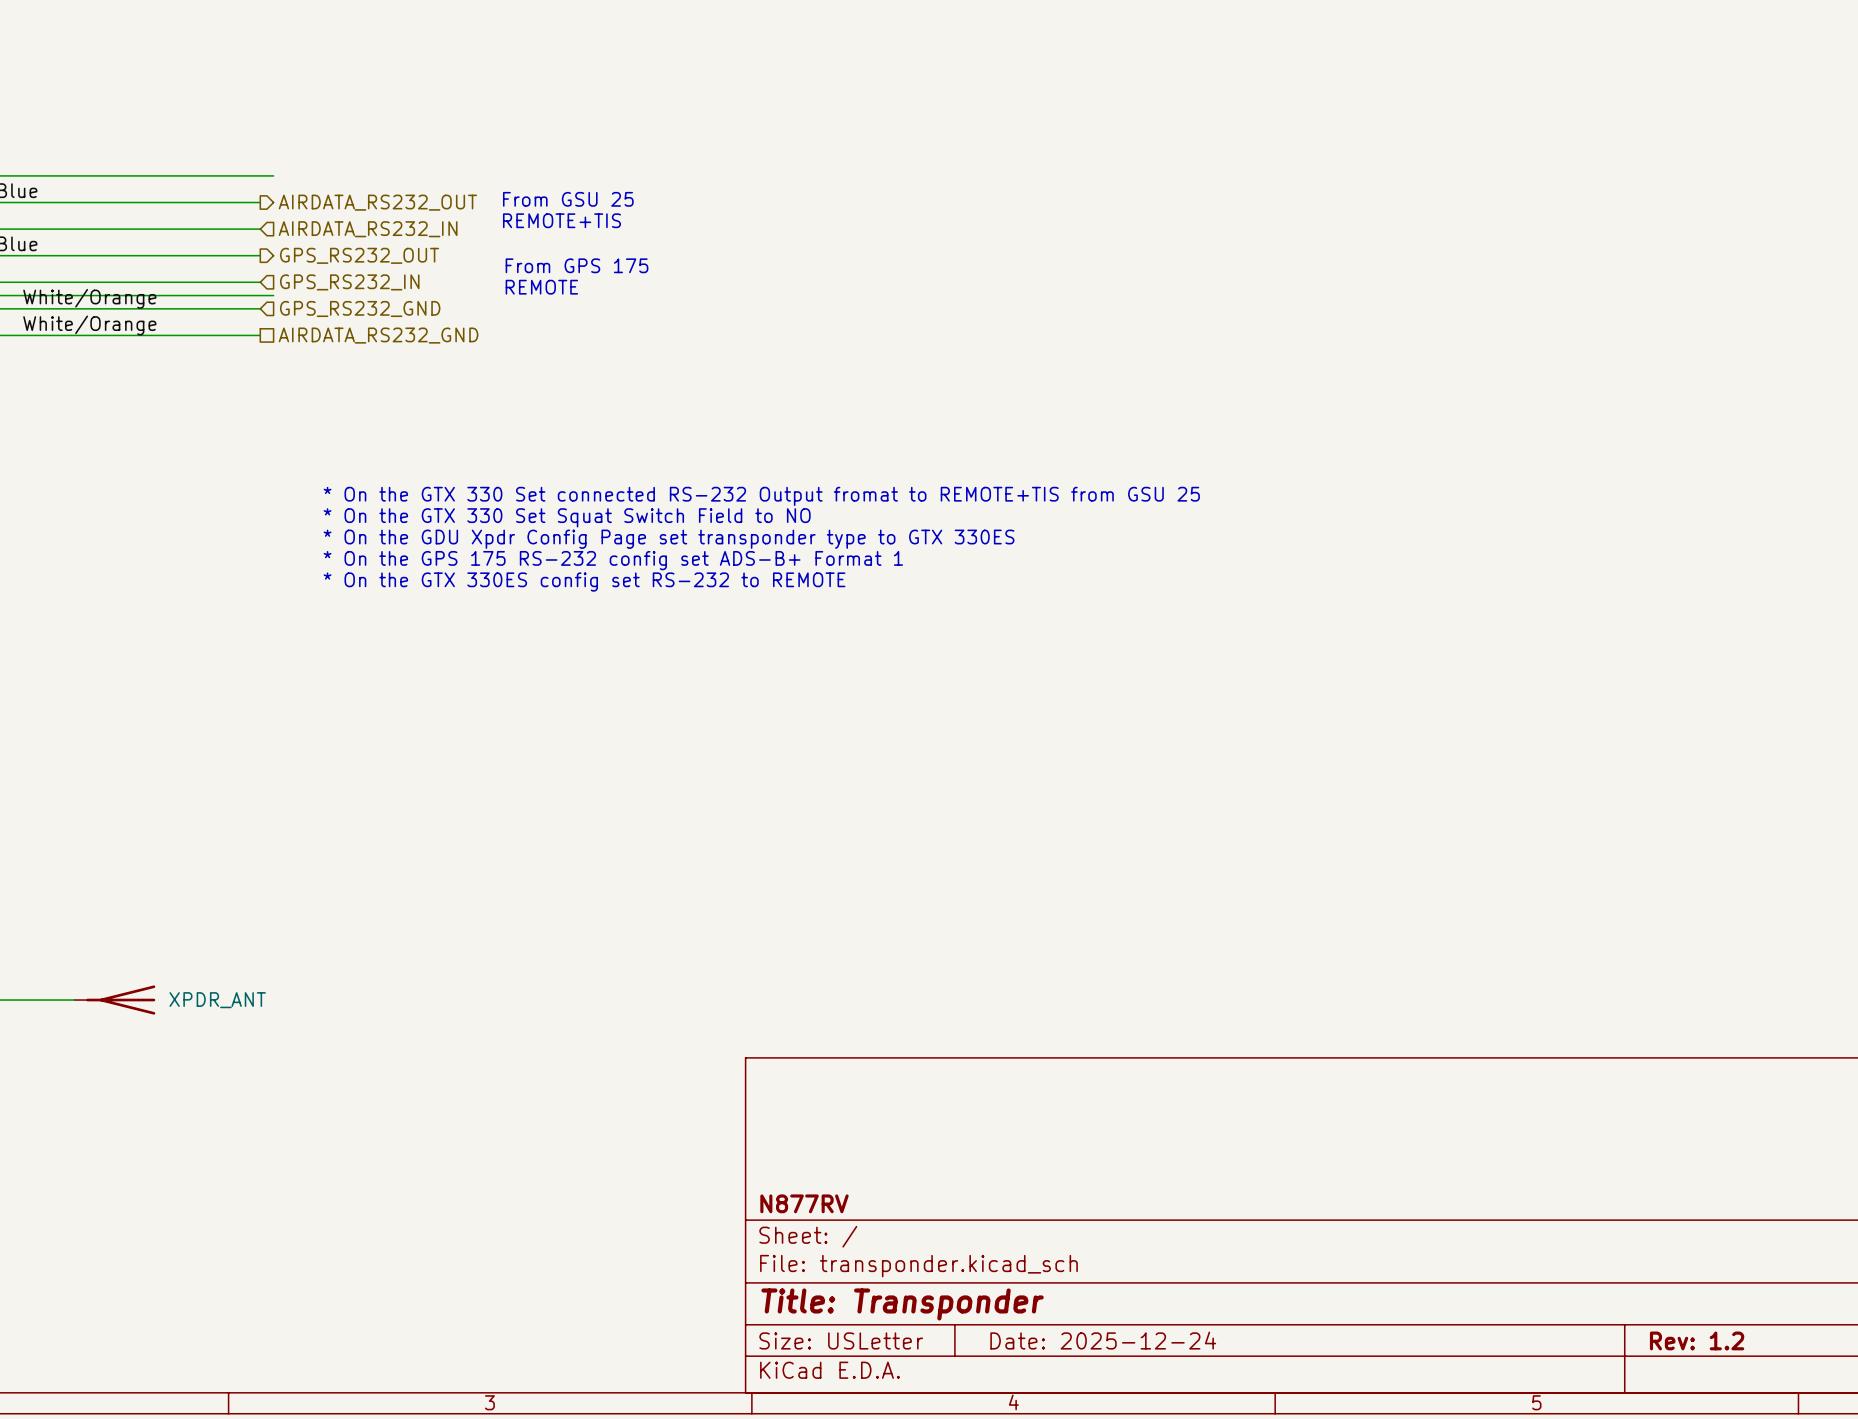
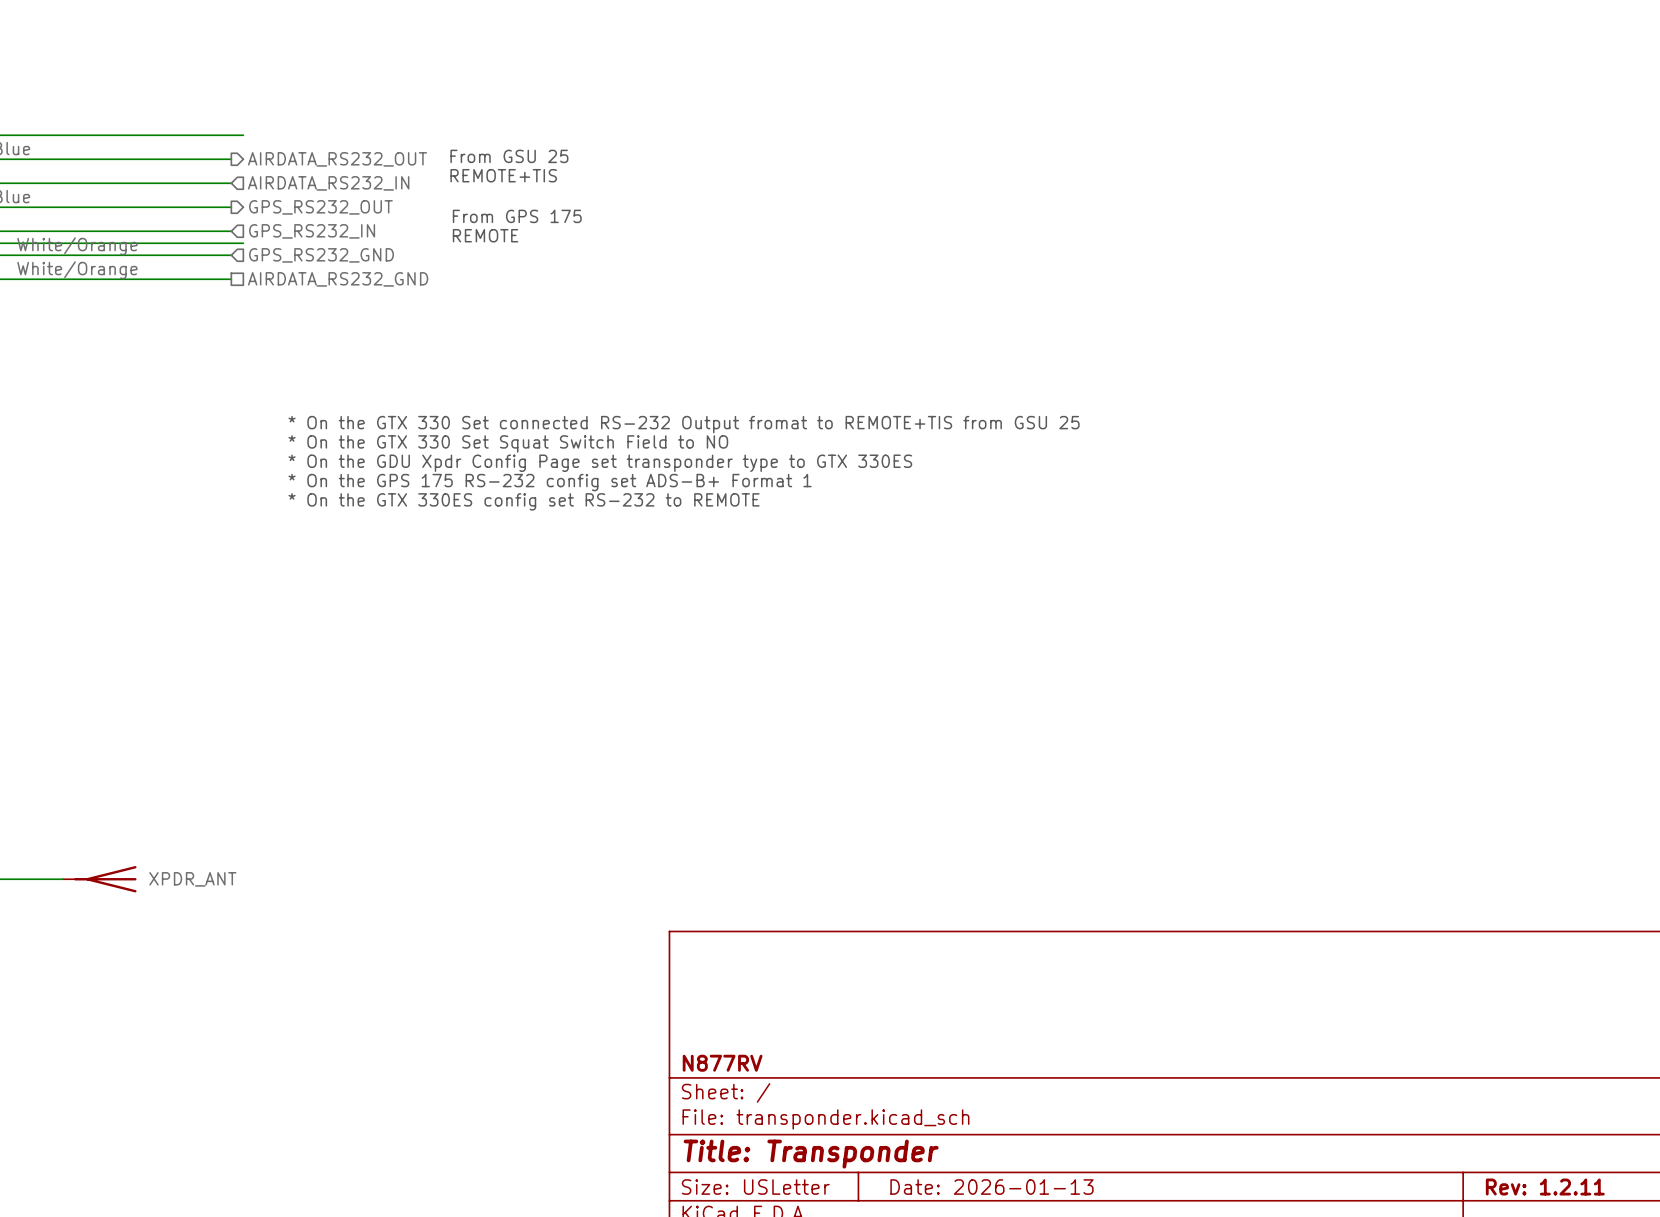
title block: Date: 2025-12-24 (1103, 1340) -> Date: 2026-01-13 (991, 1187)
title block: Rev: 1.2 (1697, 1340) -> Rev: 1.2.11 (1545, 1187)

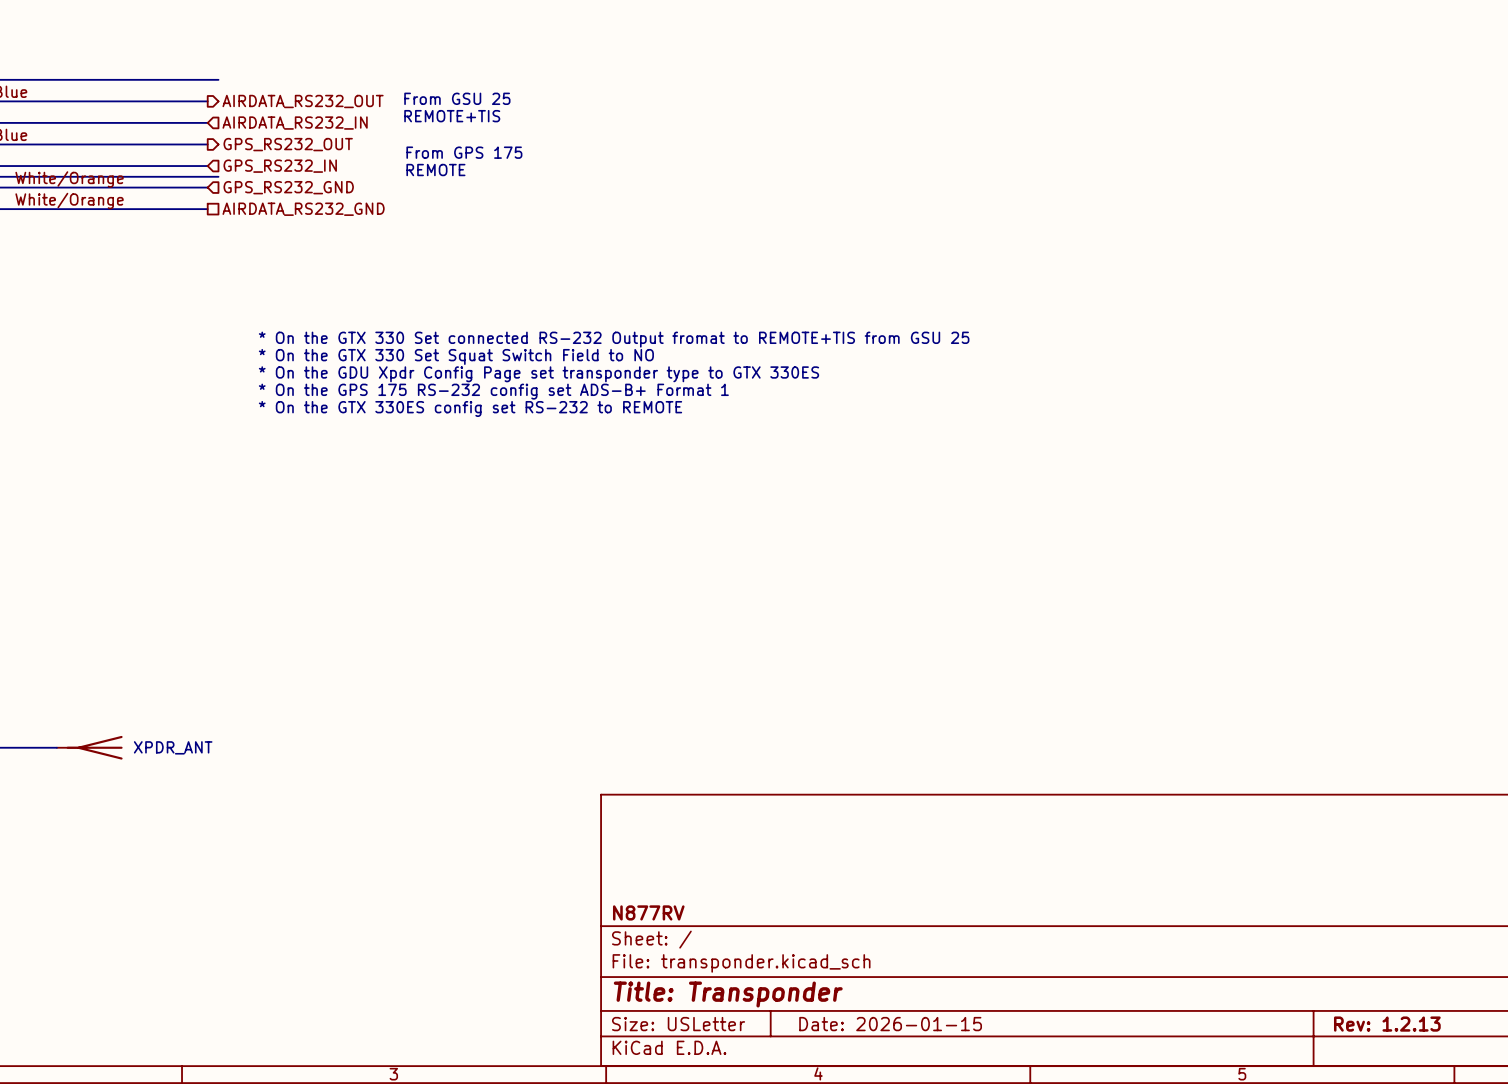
title block: Date: 2026-01-13 (991, 1187) -> Date: 2026-01-15 (890, 1024)
title block: Rev: 1.2.11 (1545, 1187) -> Rev: 1.2.13 (1387, 1024)

